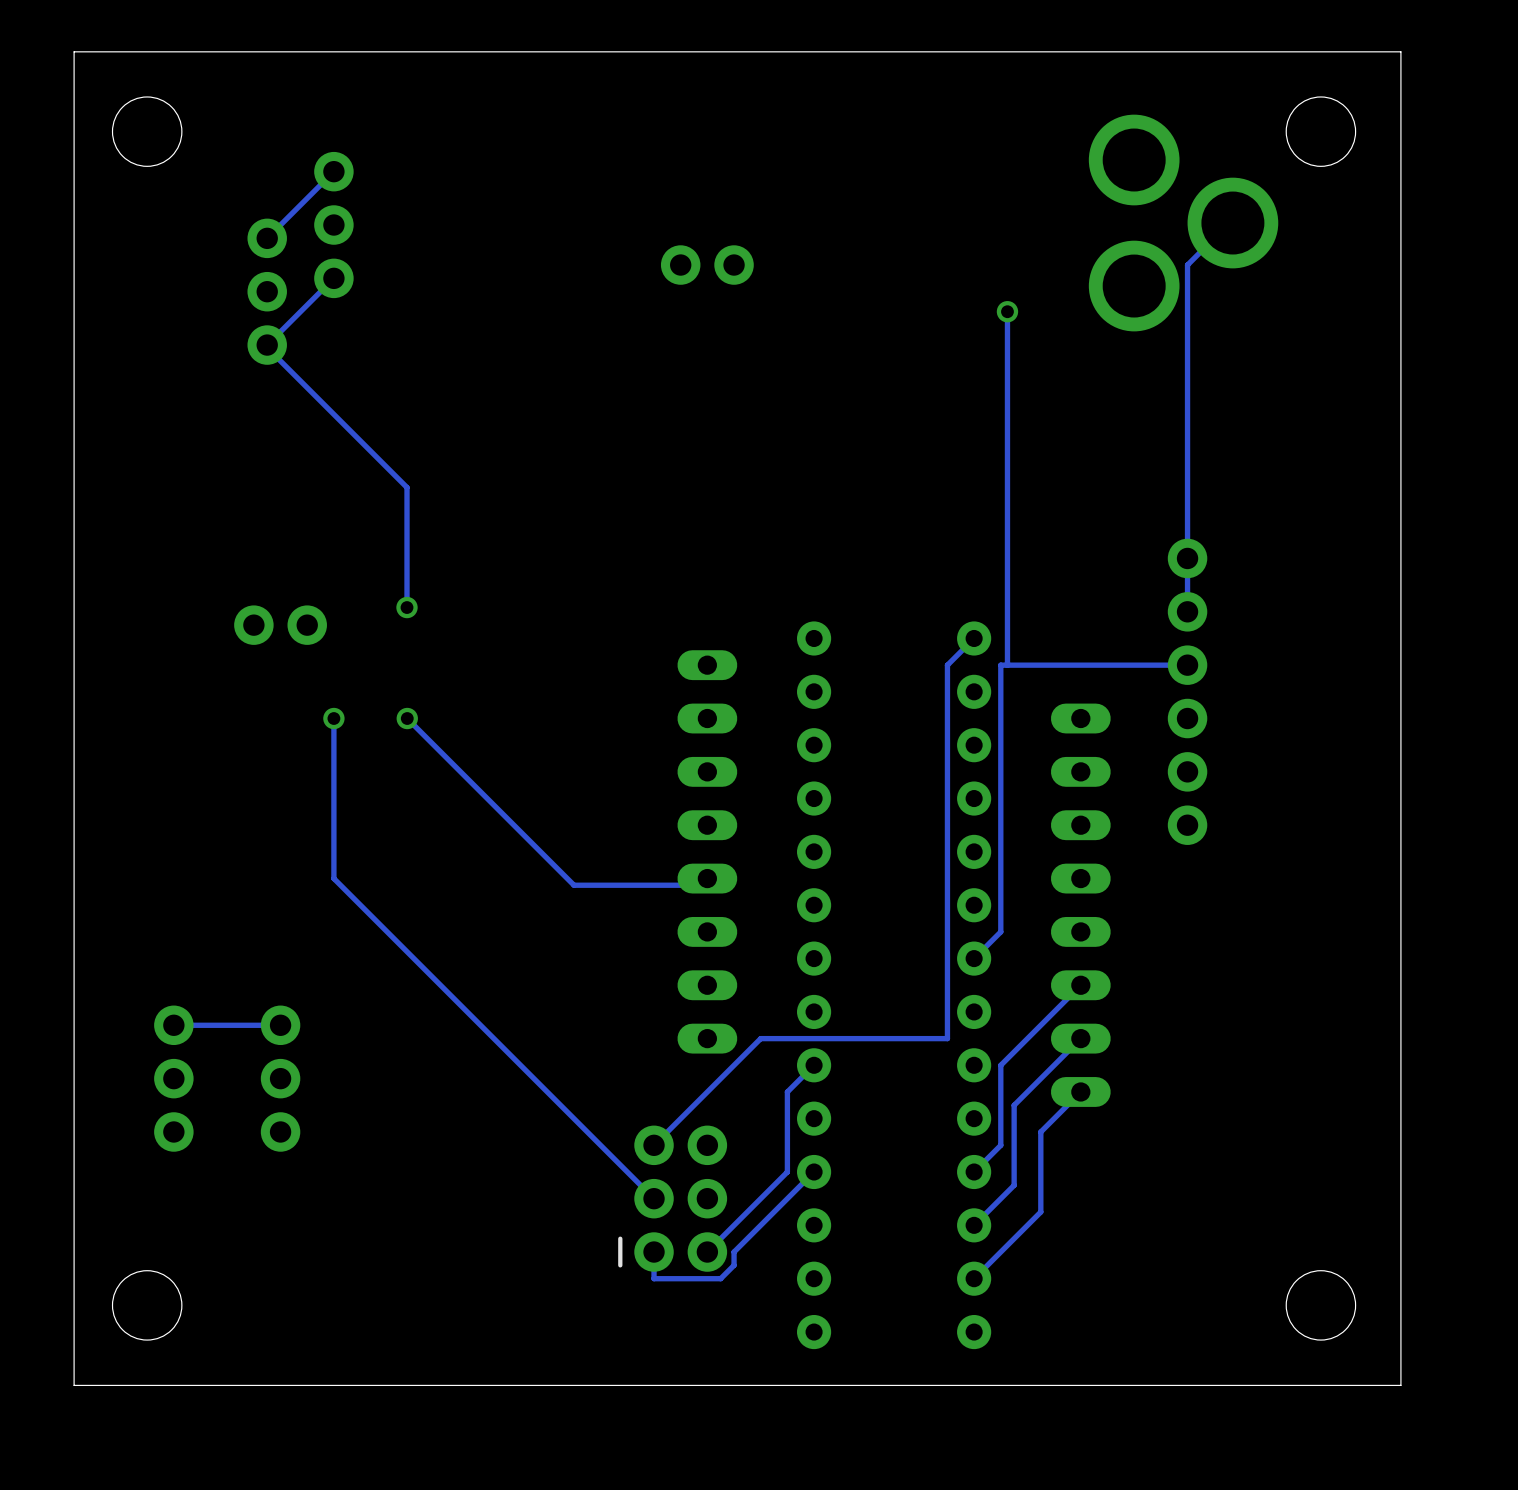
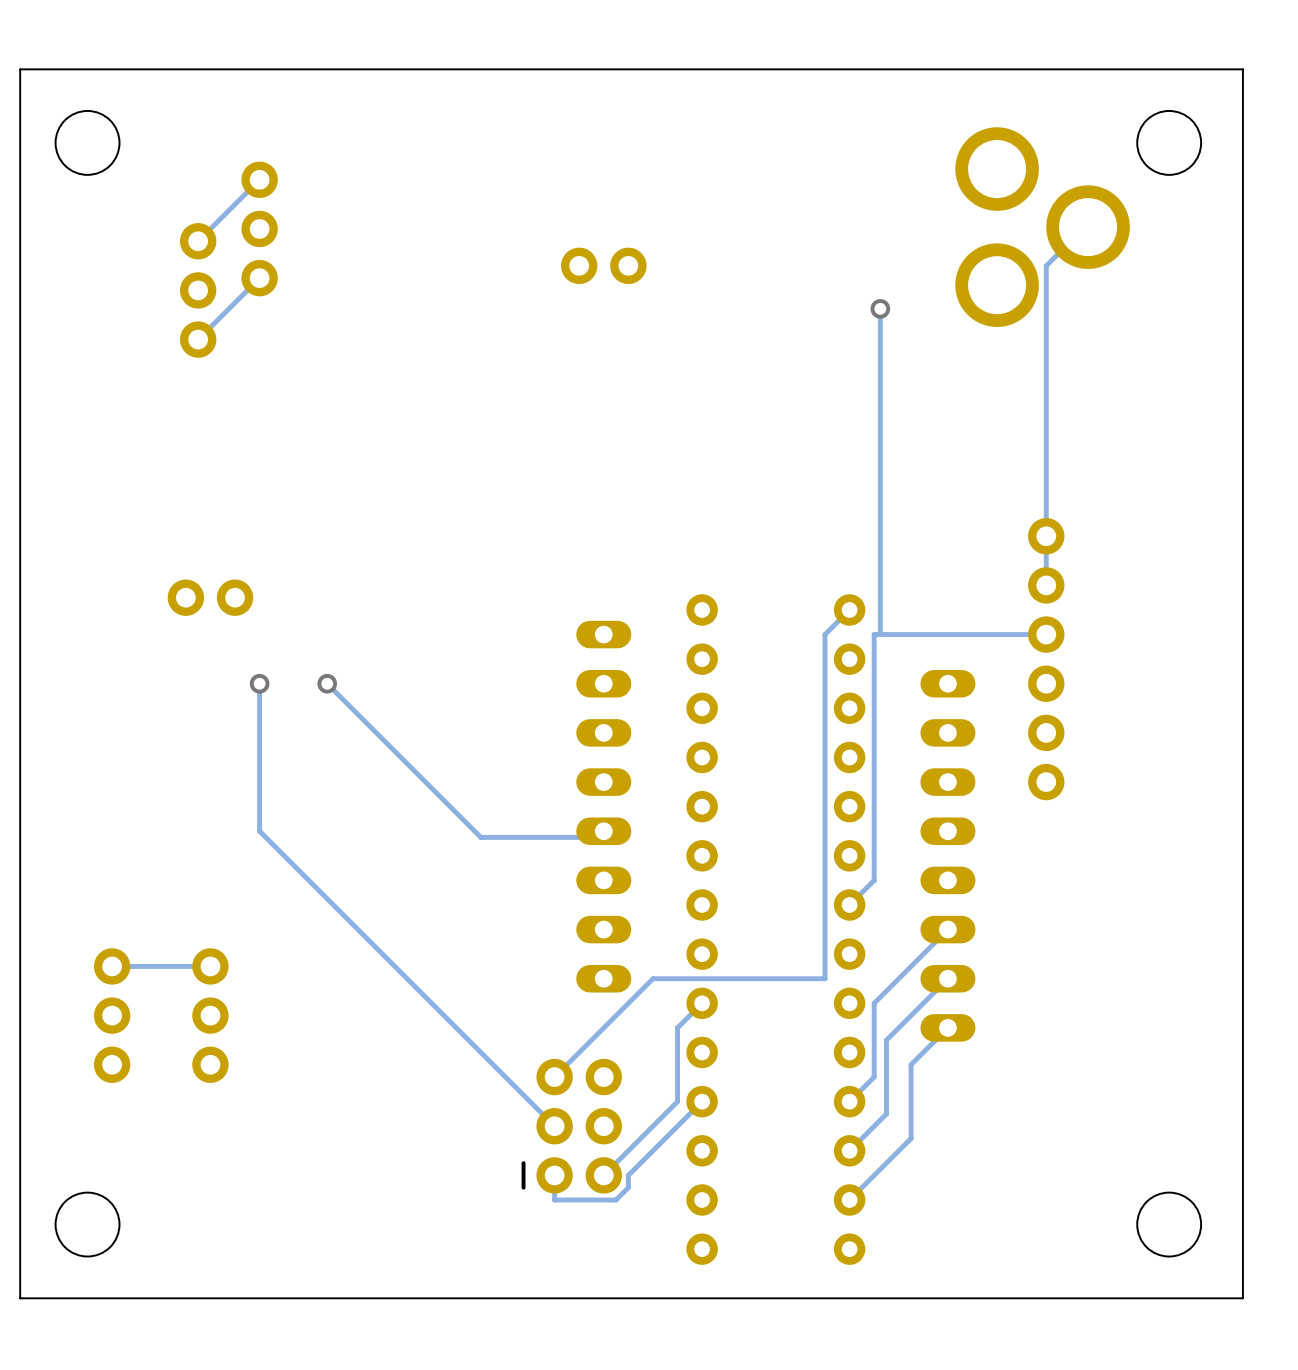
track: (267, 345) (267, 348) (407, 487) (407, 607) -> none
via: (407, 607) -> none

